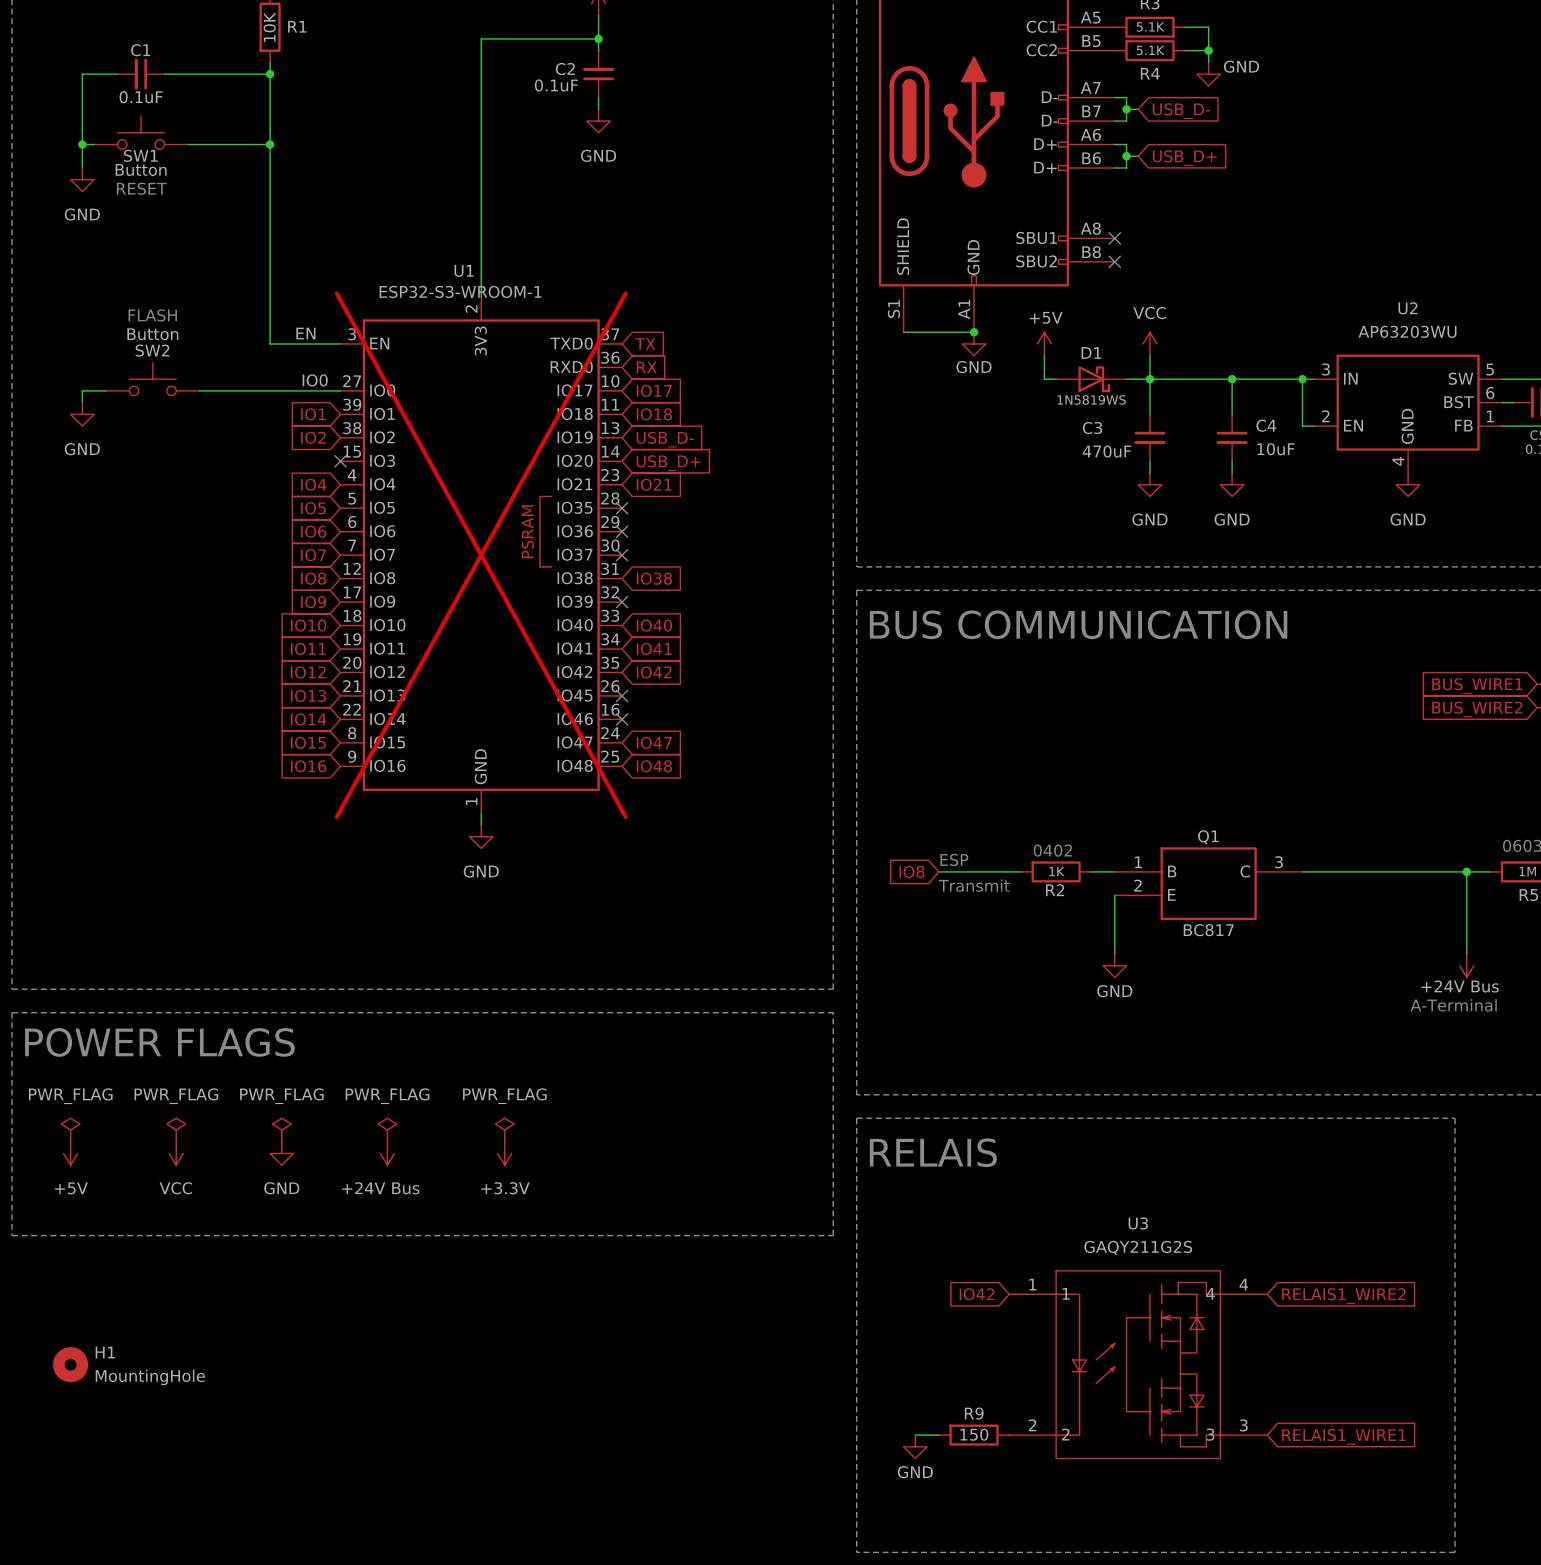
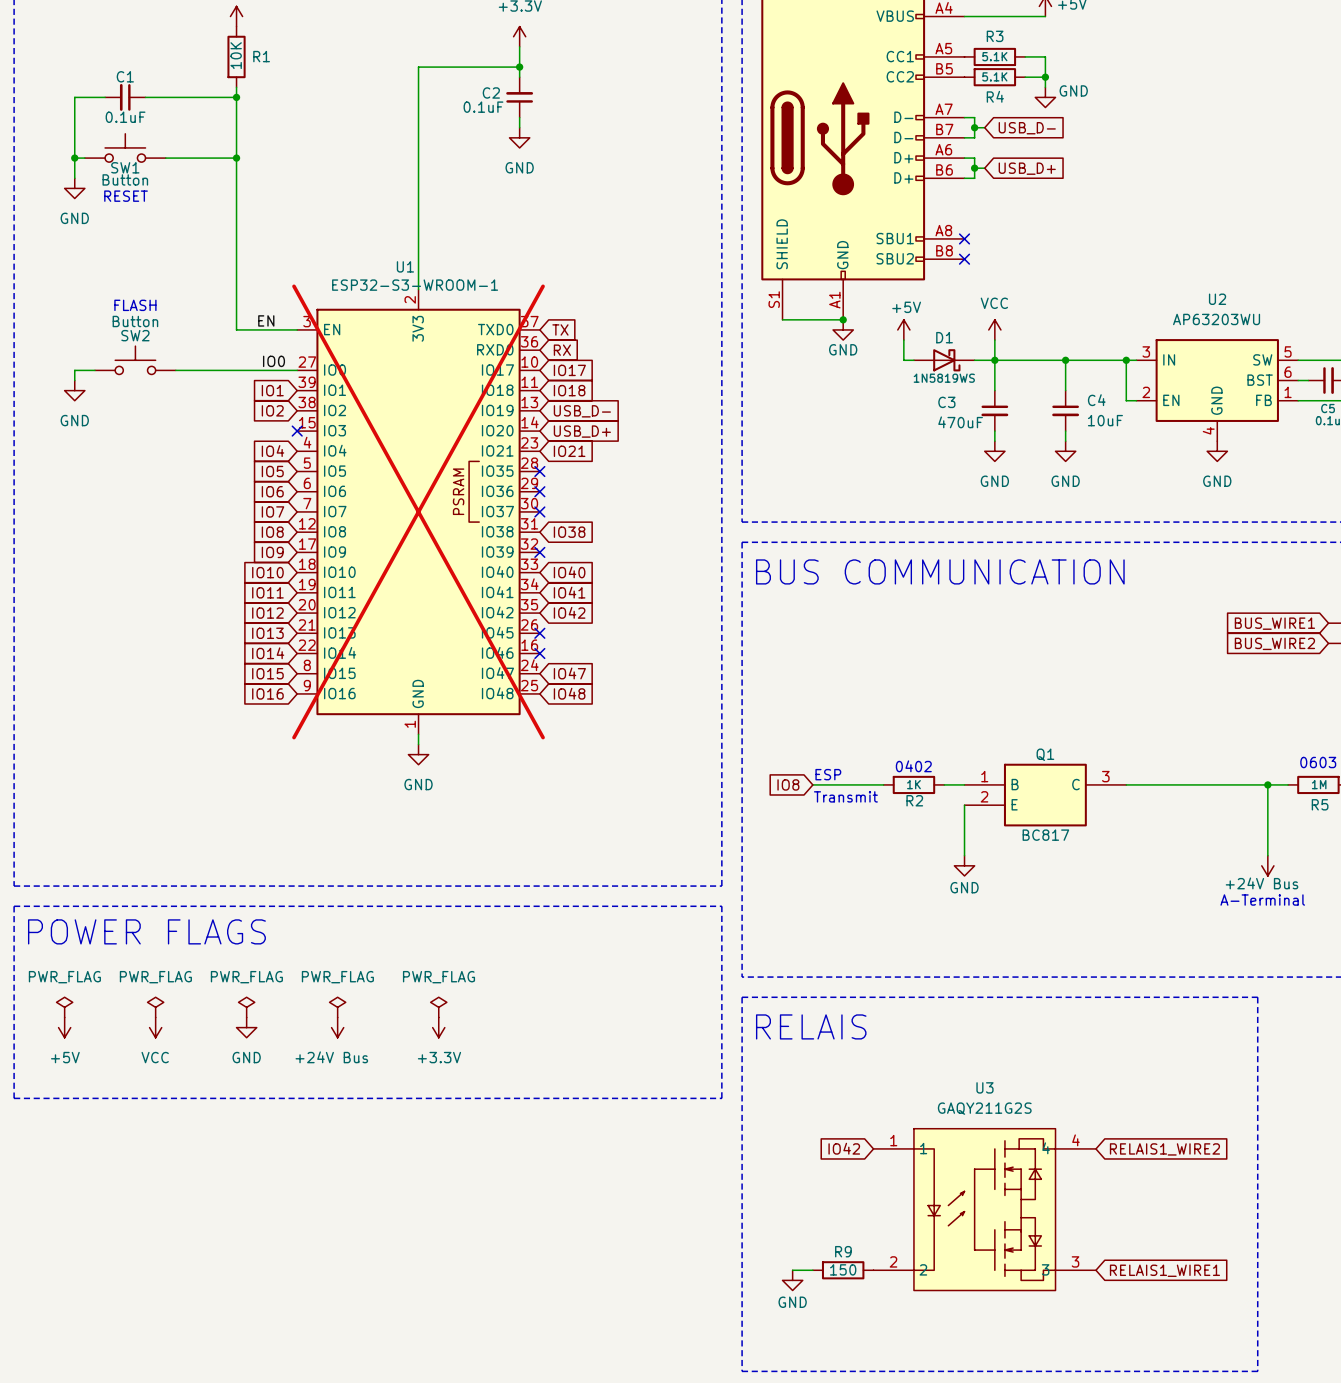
H1: MountingHole (70, 1364) -> none

